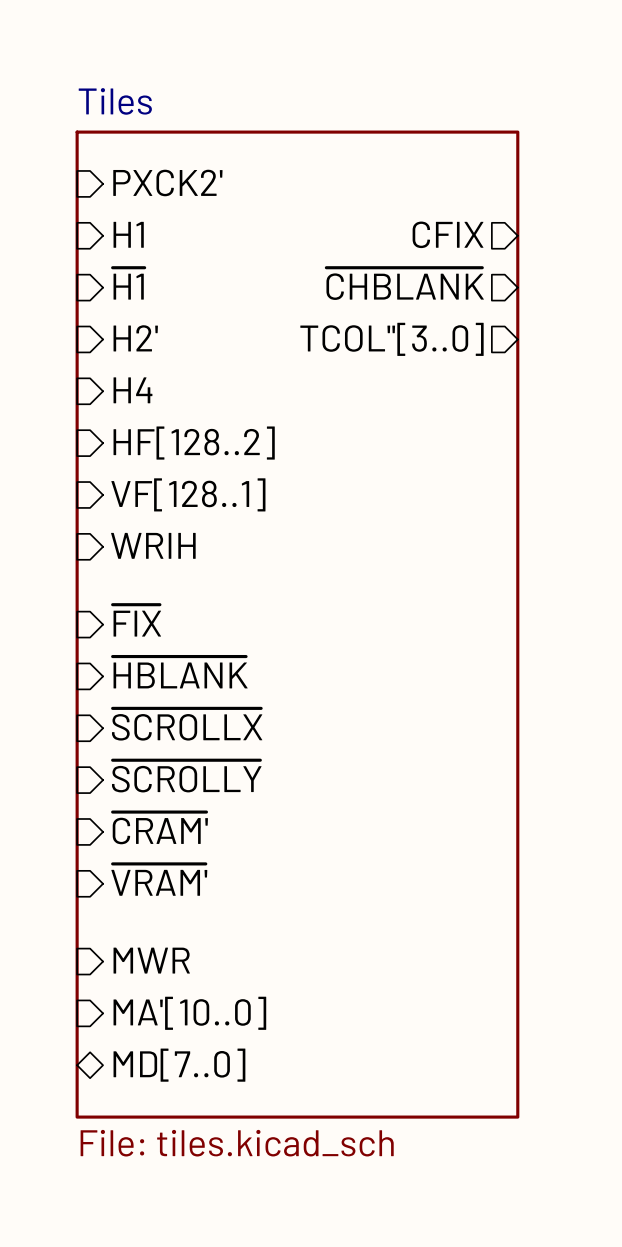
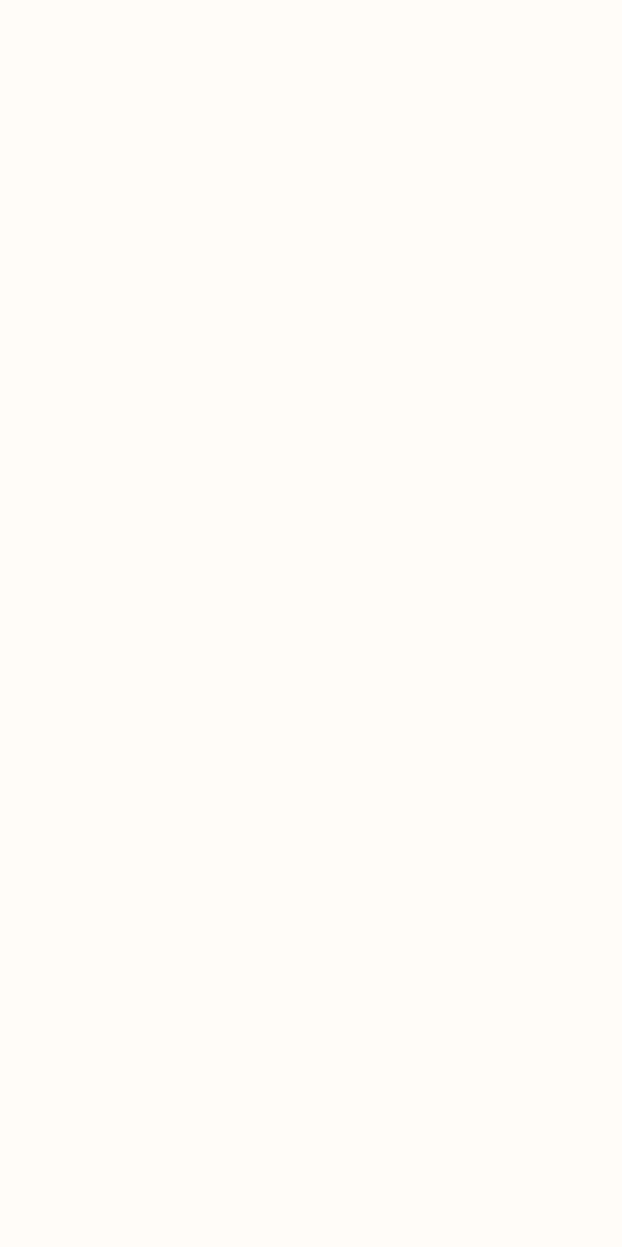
sheet pin: PXCK2' (167, 182) -> none
sheet pin: H1 (128, 234) -> none
sheet pin: CFIX (448, 234) -> none
sheet pin: ~{H1} (128, 283) -> none
sheet pin: ~{CHBLANK} (405, 283) -> none
sheet pin: H2' (135, 338) -> none
sheet pin: TCOL''[3..0] (391, 339) -> none
sheet pin: H4 (132, 390) -> none
sheet pin: HF[128..2] (194, 443) -> none
sheet pin: VF[128..1] (188, 494) -> none
sheet pin: WRIH (153, 545) -> none
sheet pin: ~{FIX} (136, 620) -> none
sheet Tiles: File: tiles.kicad_sch (297, 624) -> none
sheet pin: ~{HBLANK} (180, 672) -> none
sheet pin: ~{SCROLLX} (187, 724) -> none
sheet pin: ~{SCROLLY} (186, 776) -> none
sheet pin: ~{CRAM'} (160, 828) -> none
sheet pin: ~{VRAM'} (159, 879) -> none
sheet pin: MWR (151, 960) -> none
sheet pin: MA'[10..0] (189, 1013) -> none
sheet pin: MD[7..0] (179, 1065) -> none

